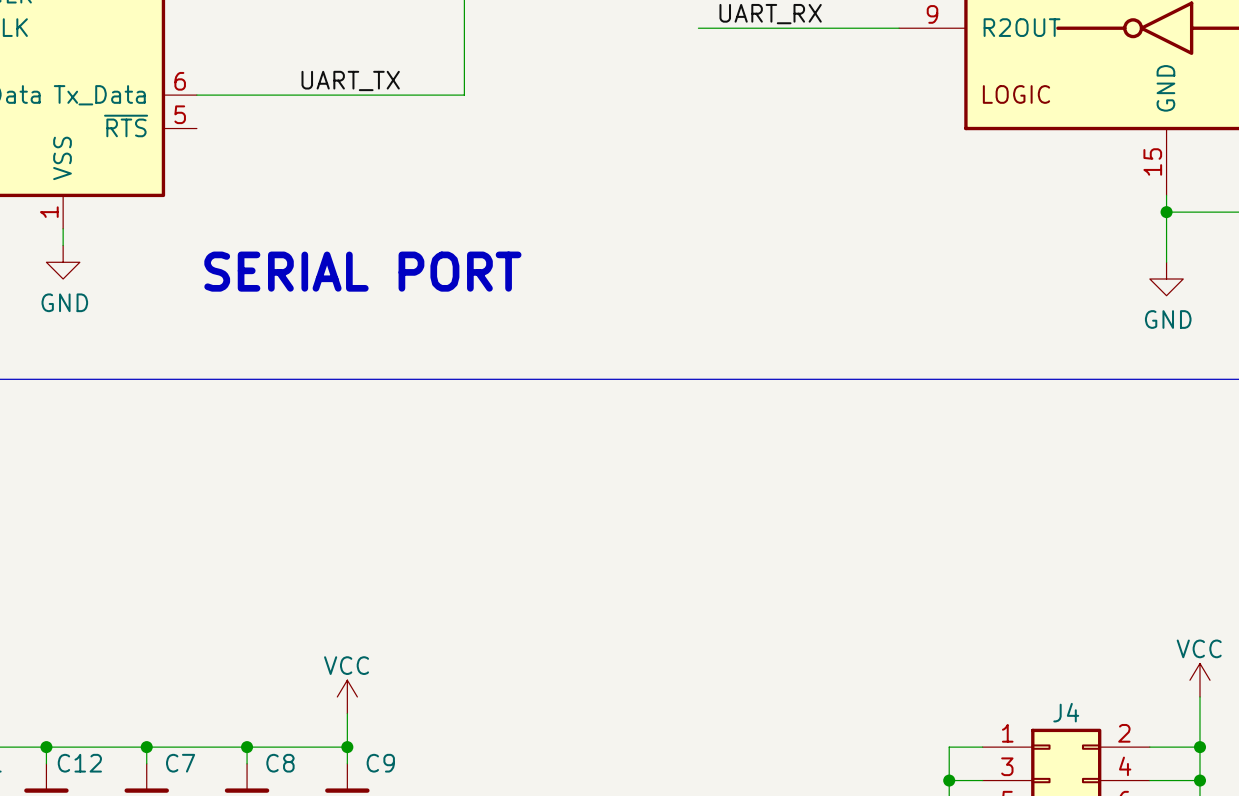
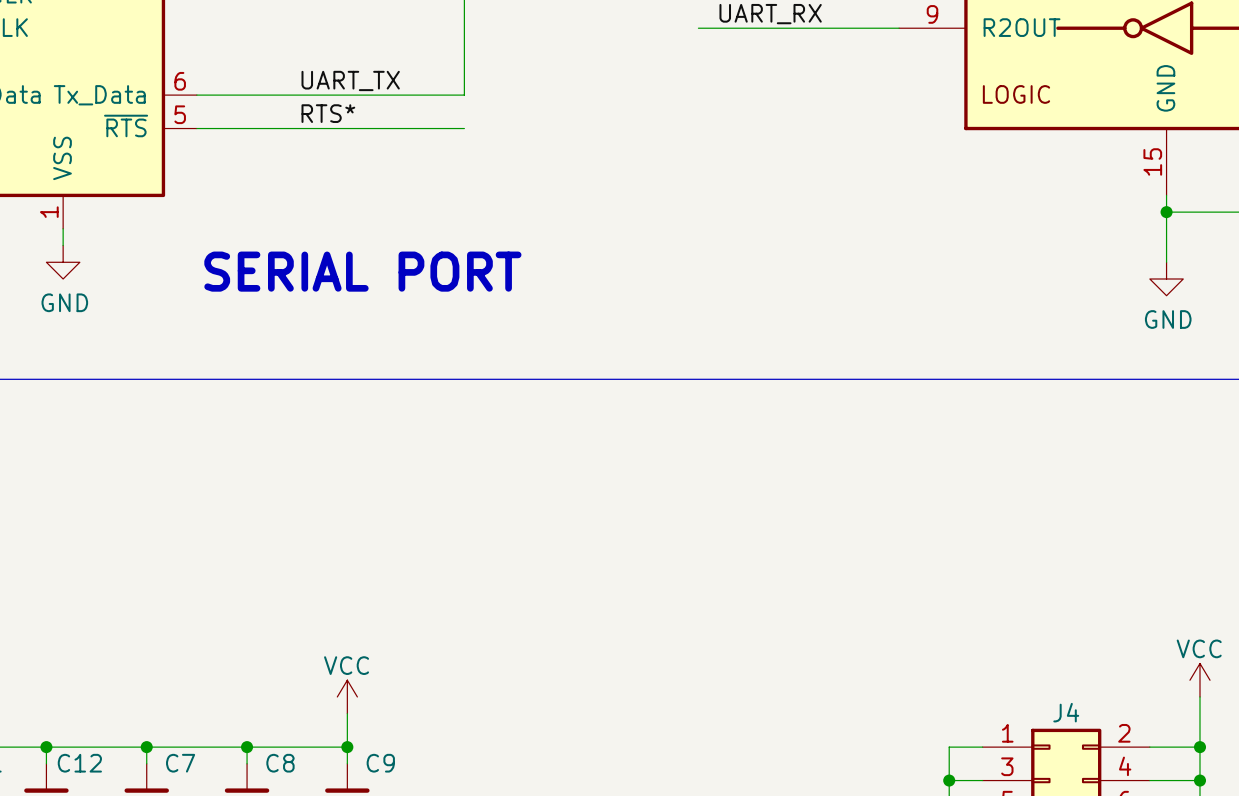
label: none -> RTS* (328, 113)
wire: none -> (196, 128) (464, 128)

